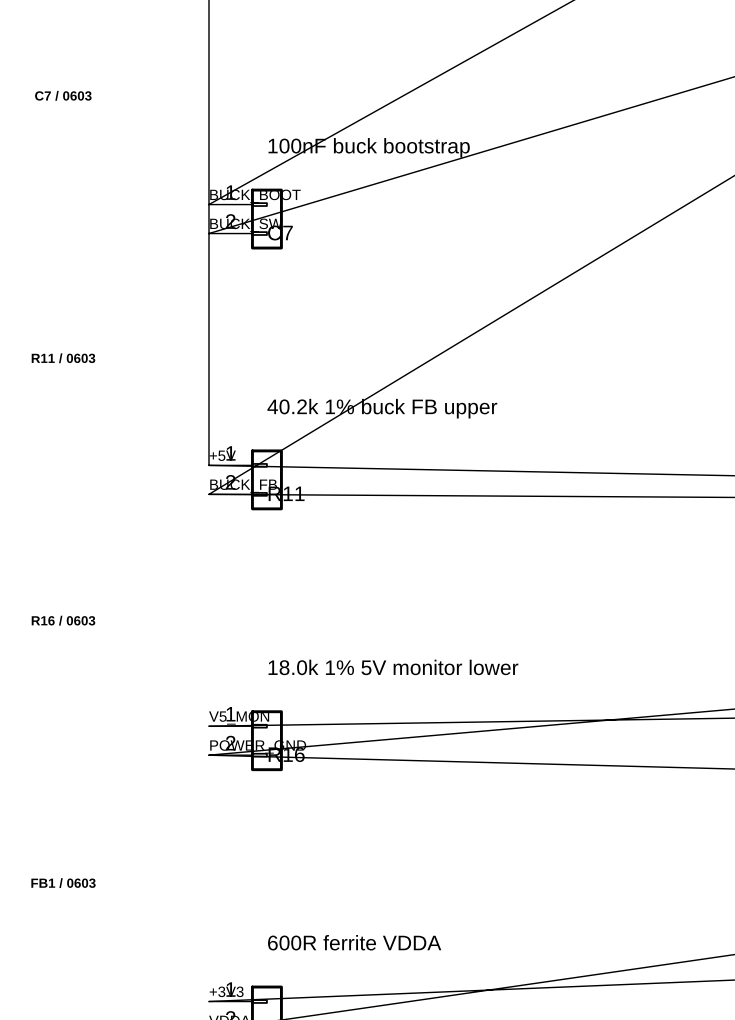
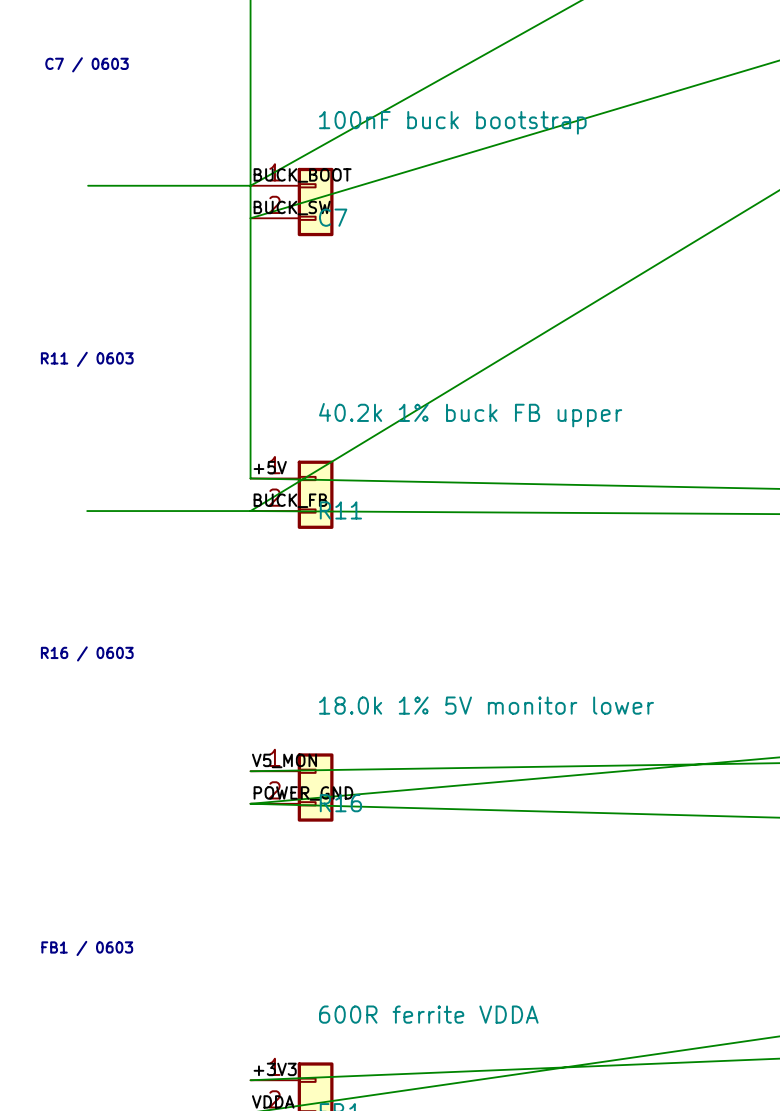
wire: none -> (88, 185) (250, 185)
wire: none -> (87, 511) (250, 511)

